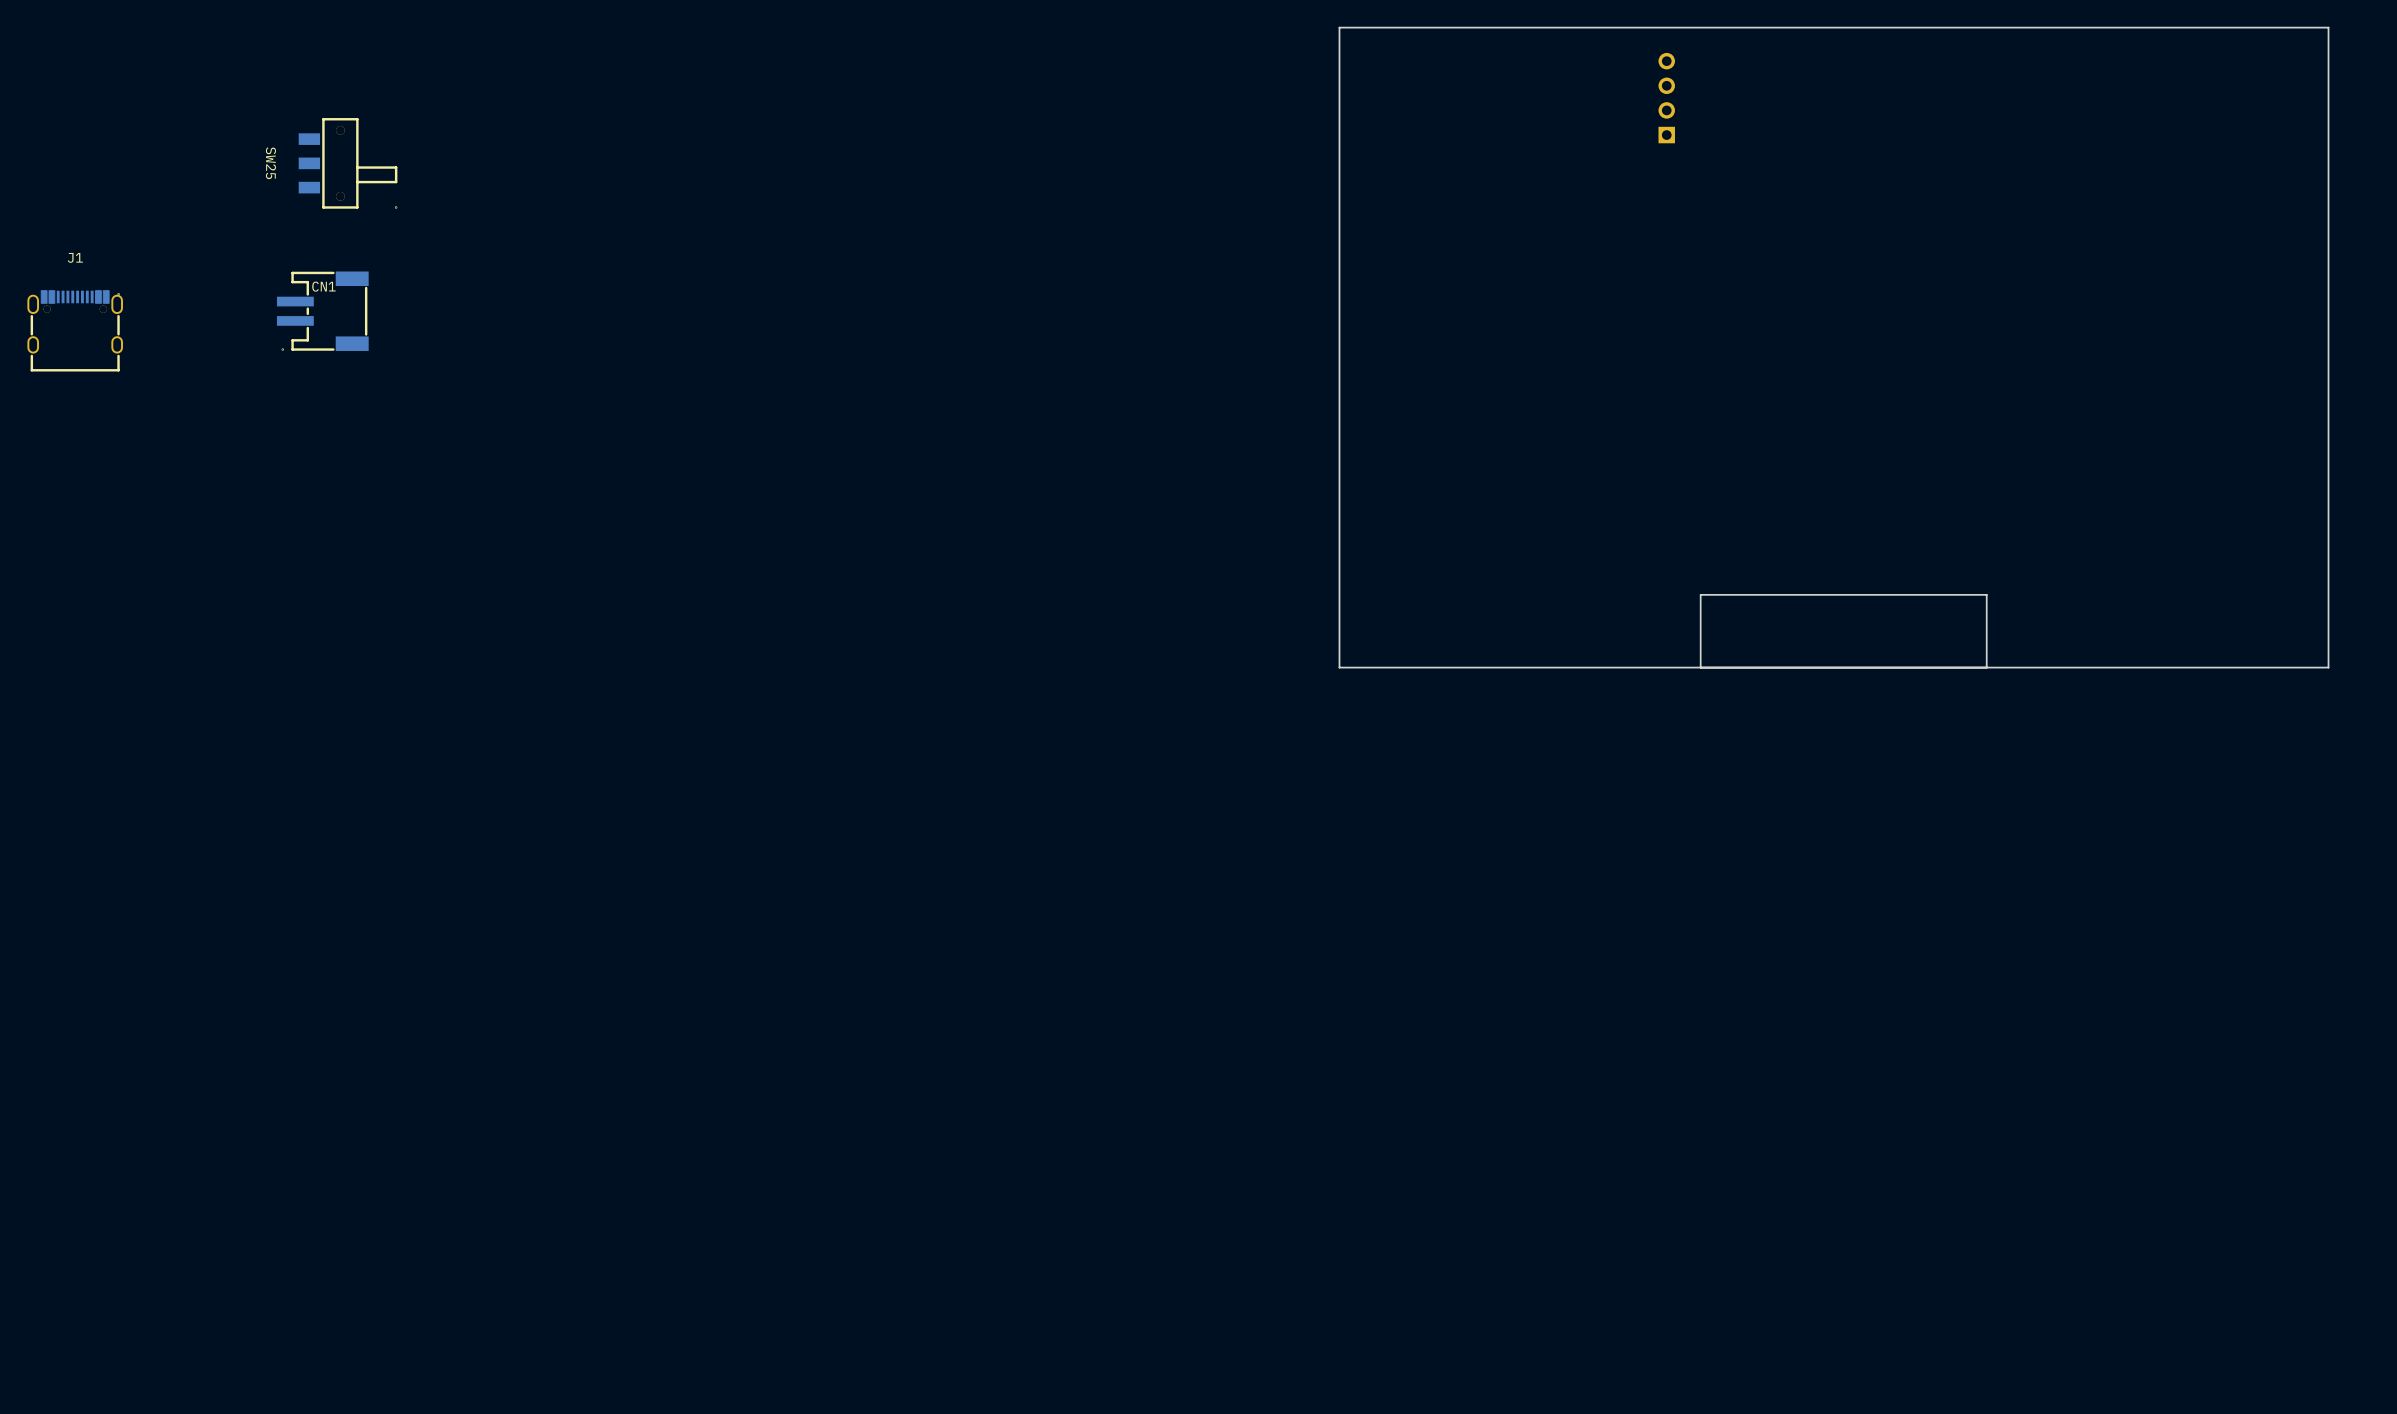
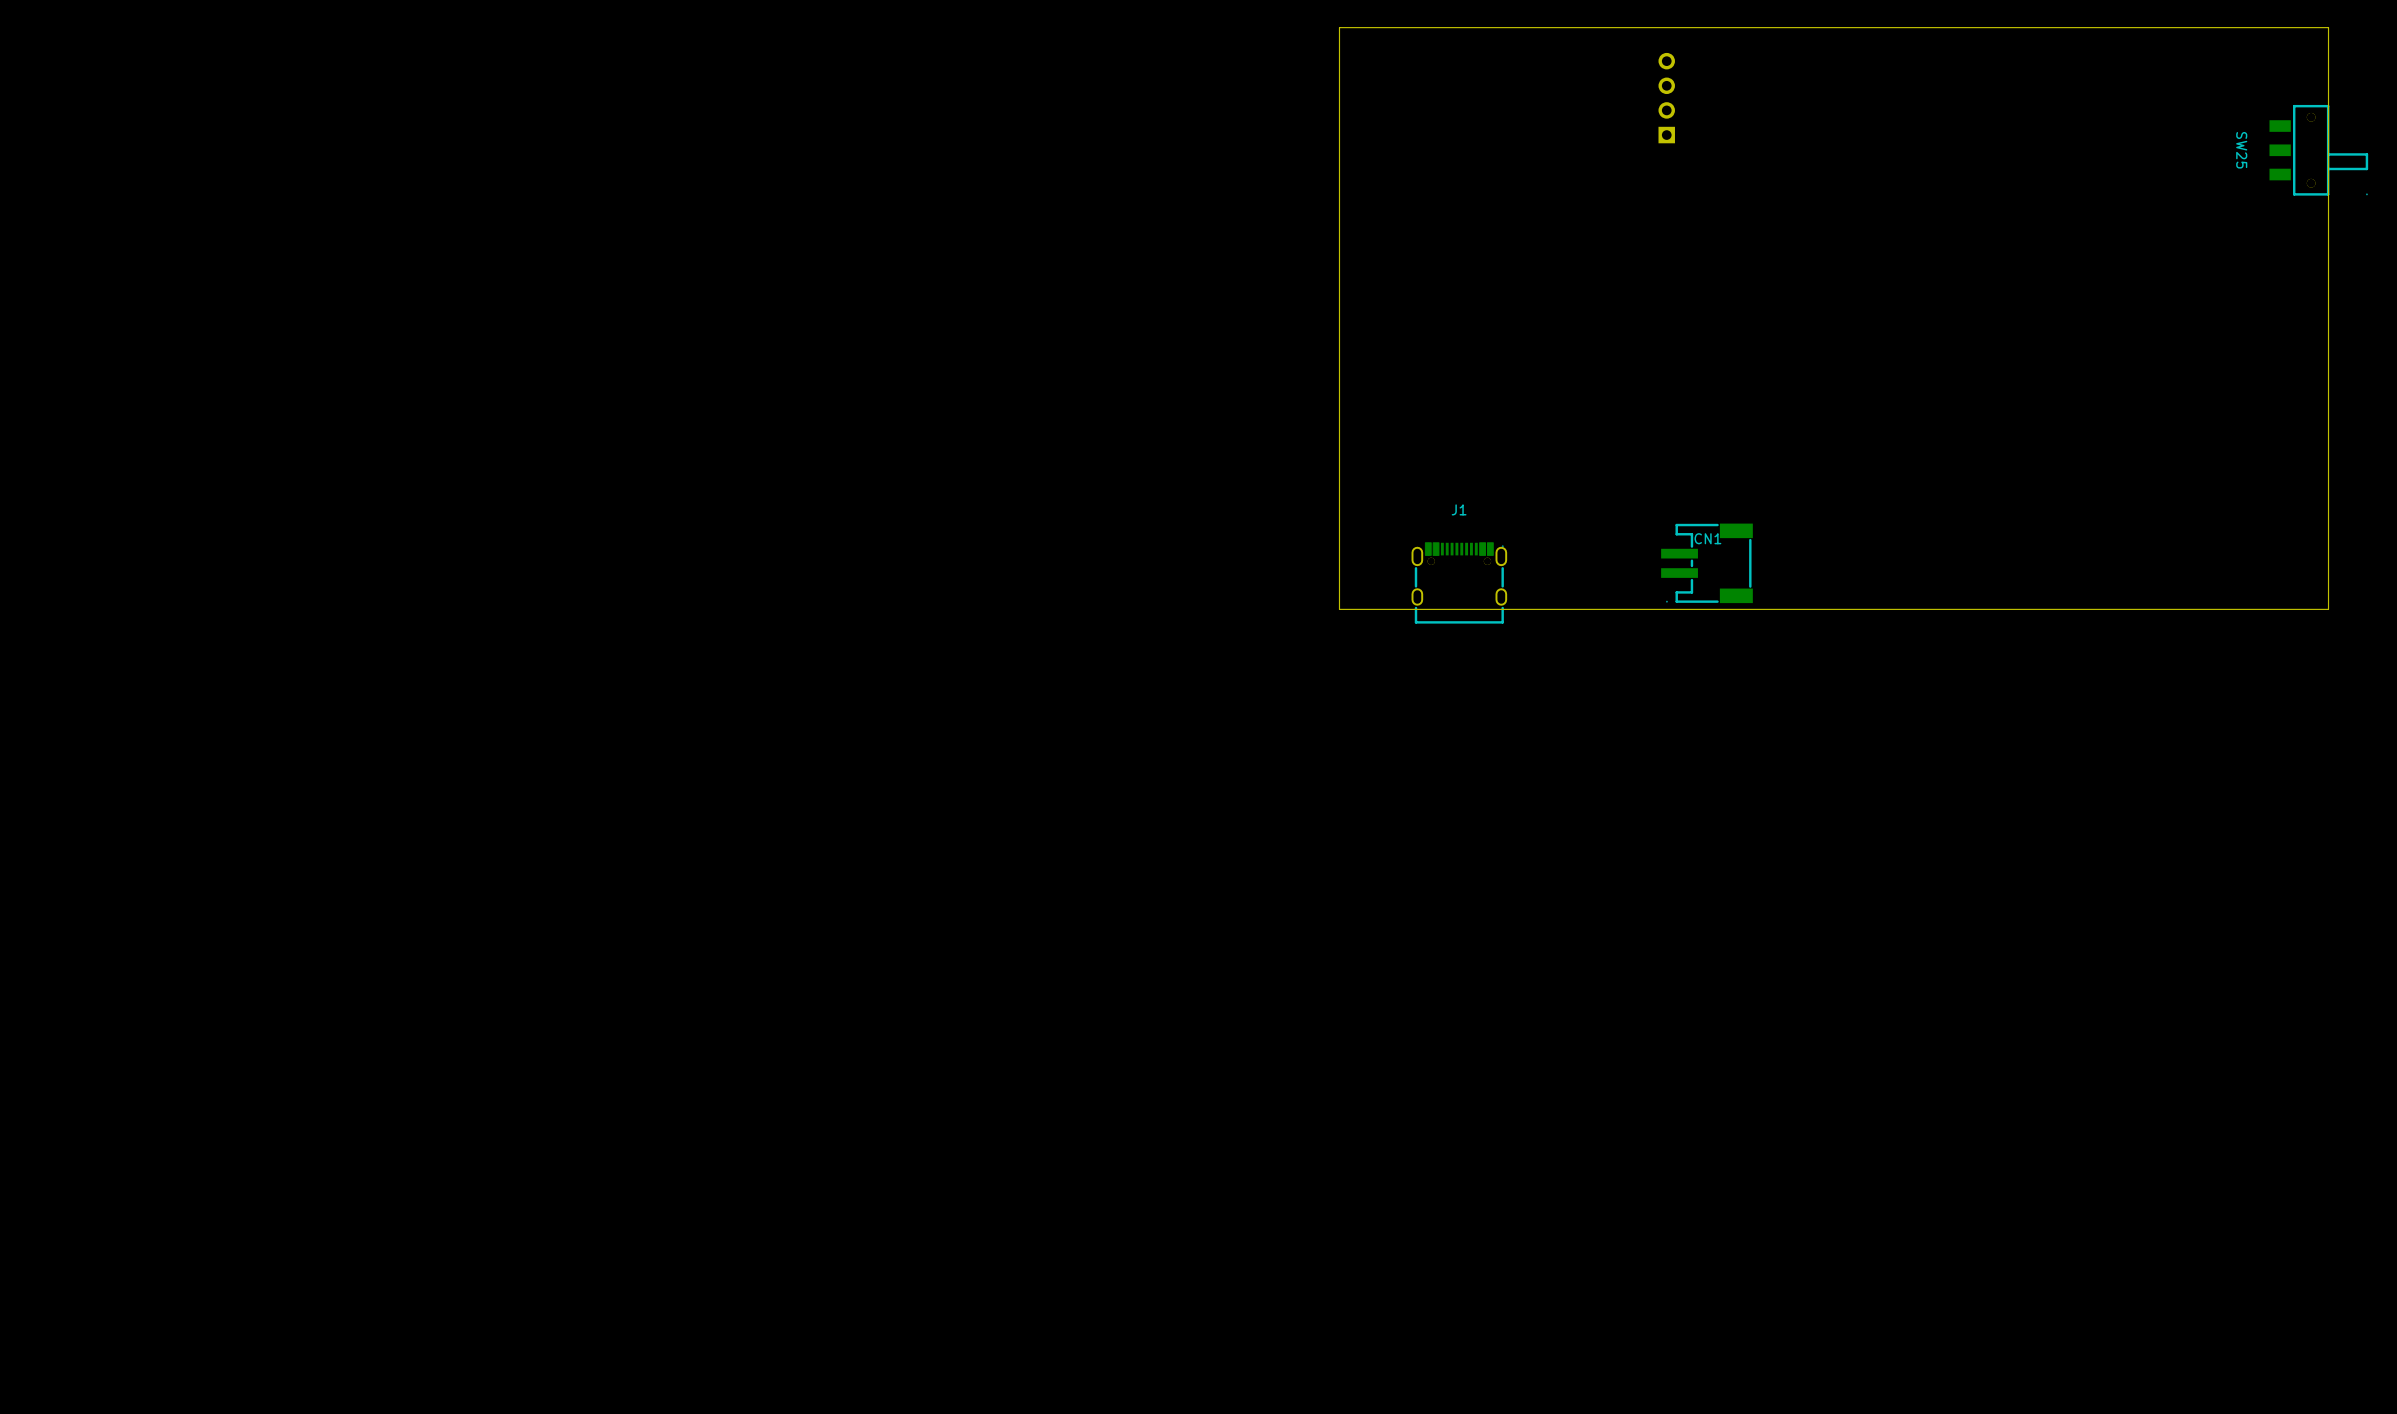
SW25 position: (348, 163) -> (2318, 150)
CN1 position: (322, 311) -> (1706, 563)
J1 position: (75, 330) -> (1459, 582)
board edge: (2328, 609) (2328, 667) (1339, 667) (1339, 609) -> (2328, 609) (1339, 609)
board edge: (1986, 667) (1986, 594) (1700, 594) (1700, 667) -> none

